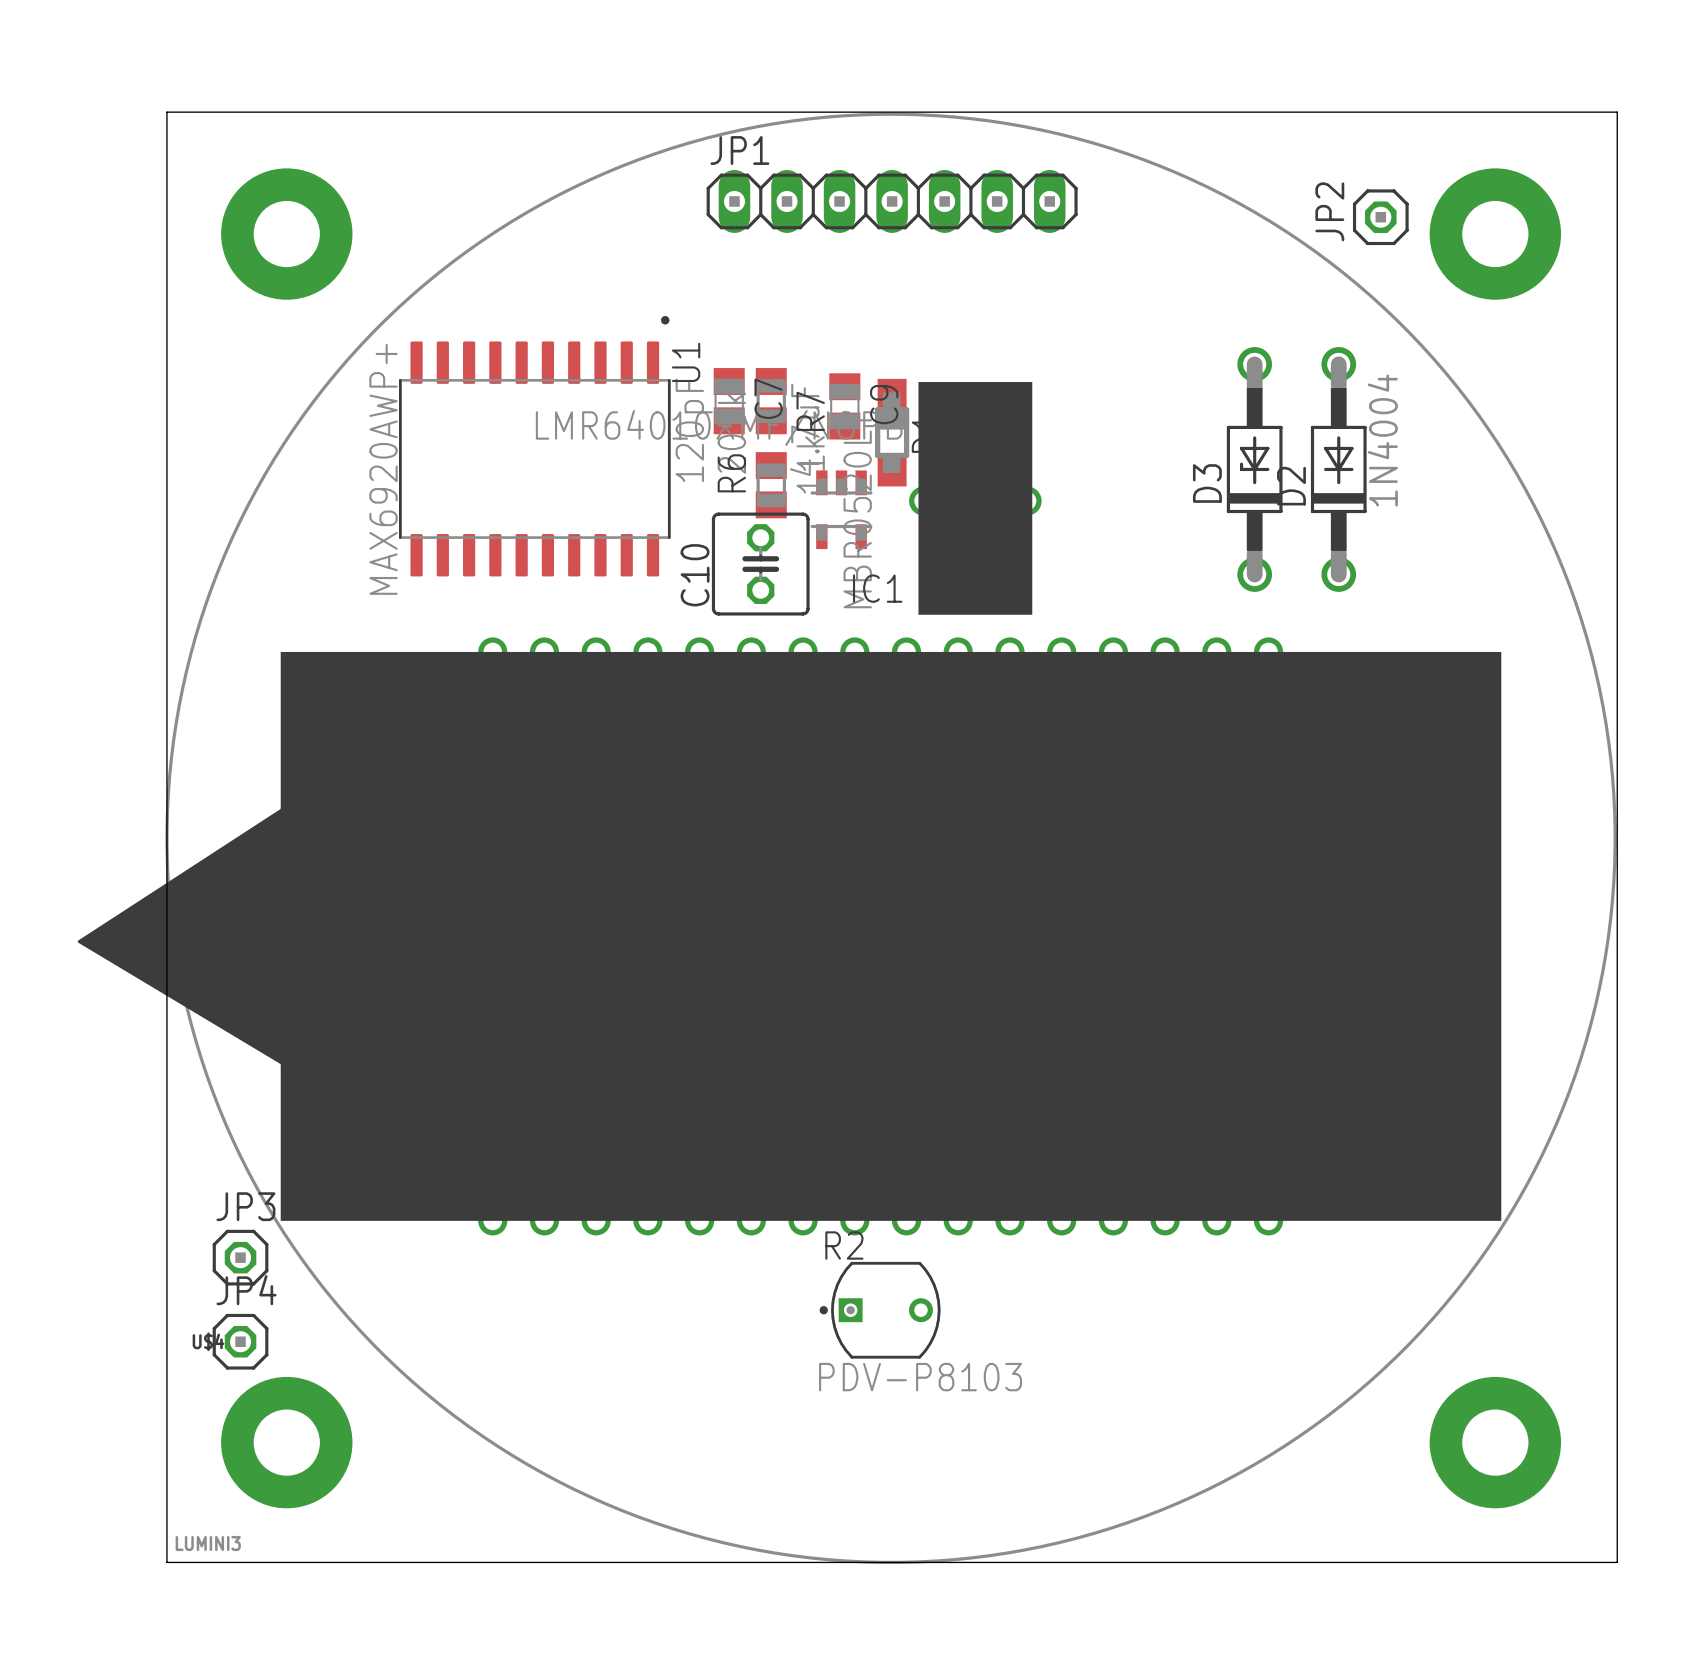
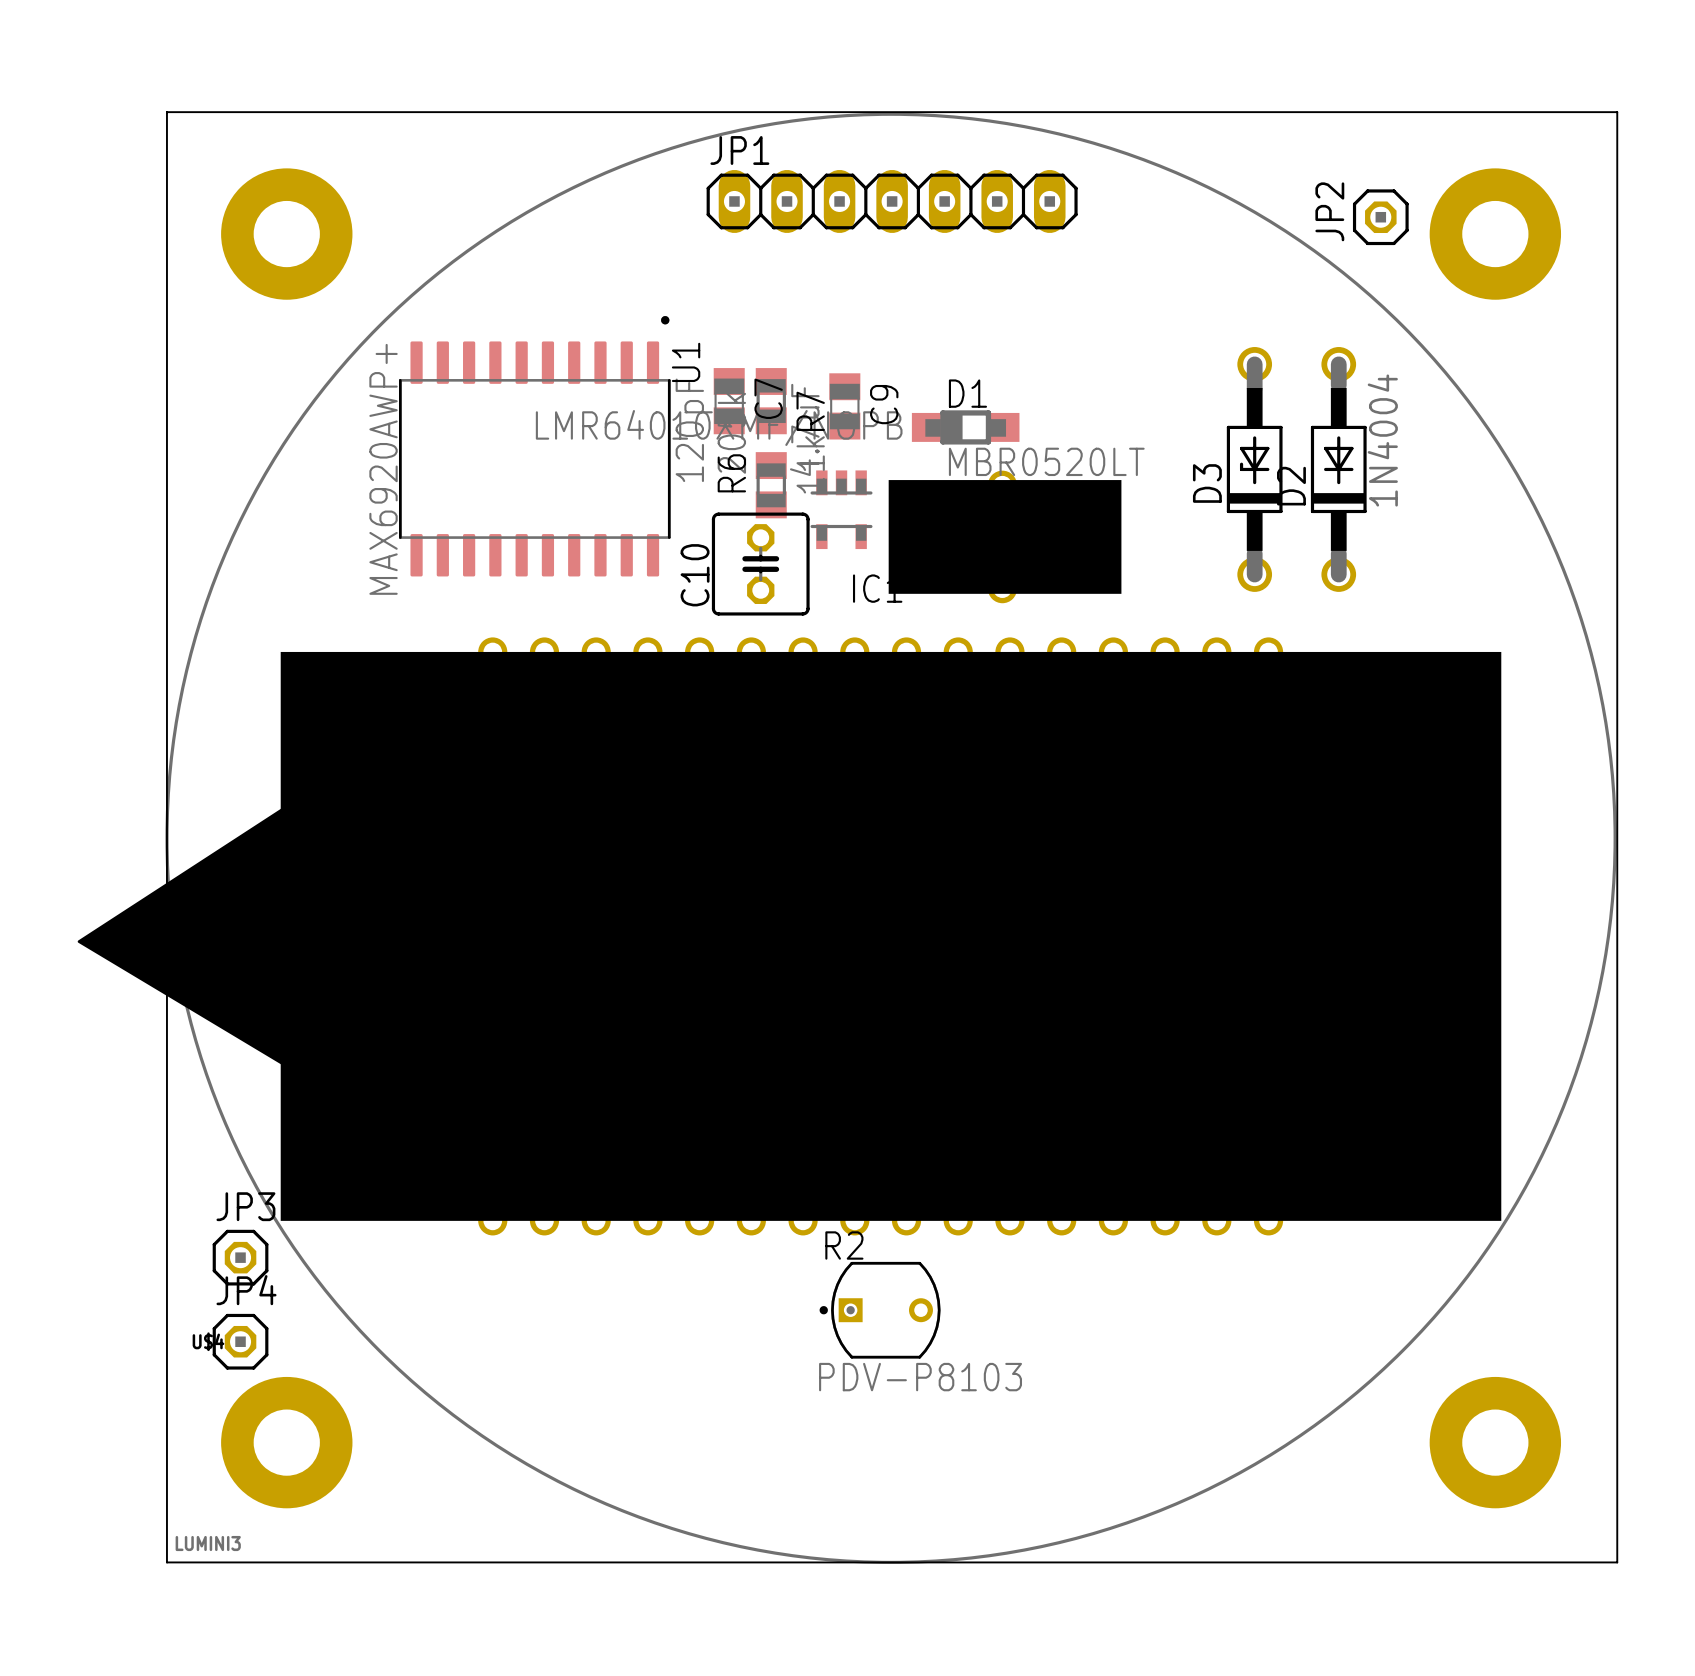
D1 rotation: 0° (892, 432) -> 90° counterclockwise (965, 427)
D1 position: (892, 432) -> (965, 427)
part rotation: 0° (975, 498) -> 90° clockwise (1005, 536)

